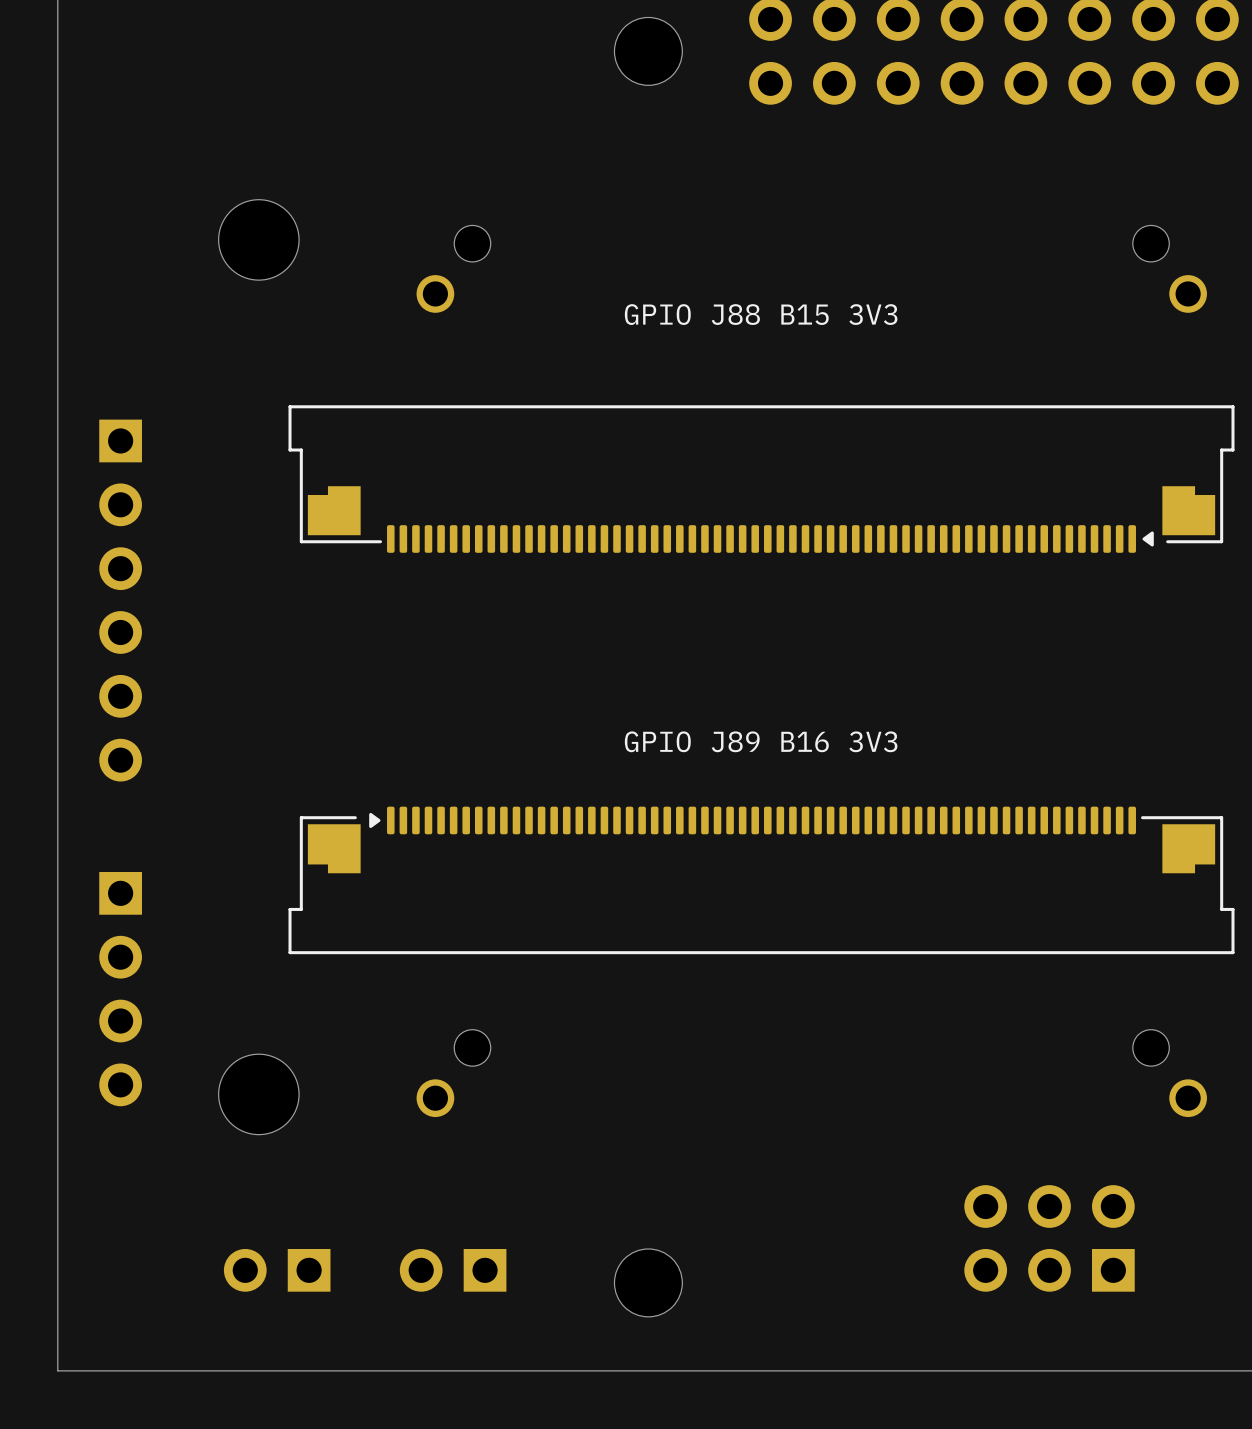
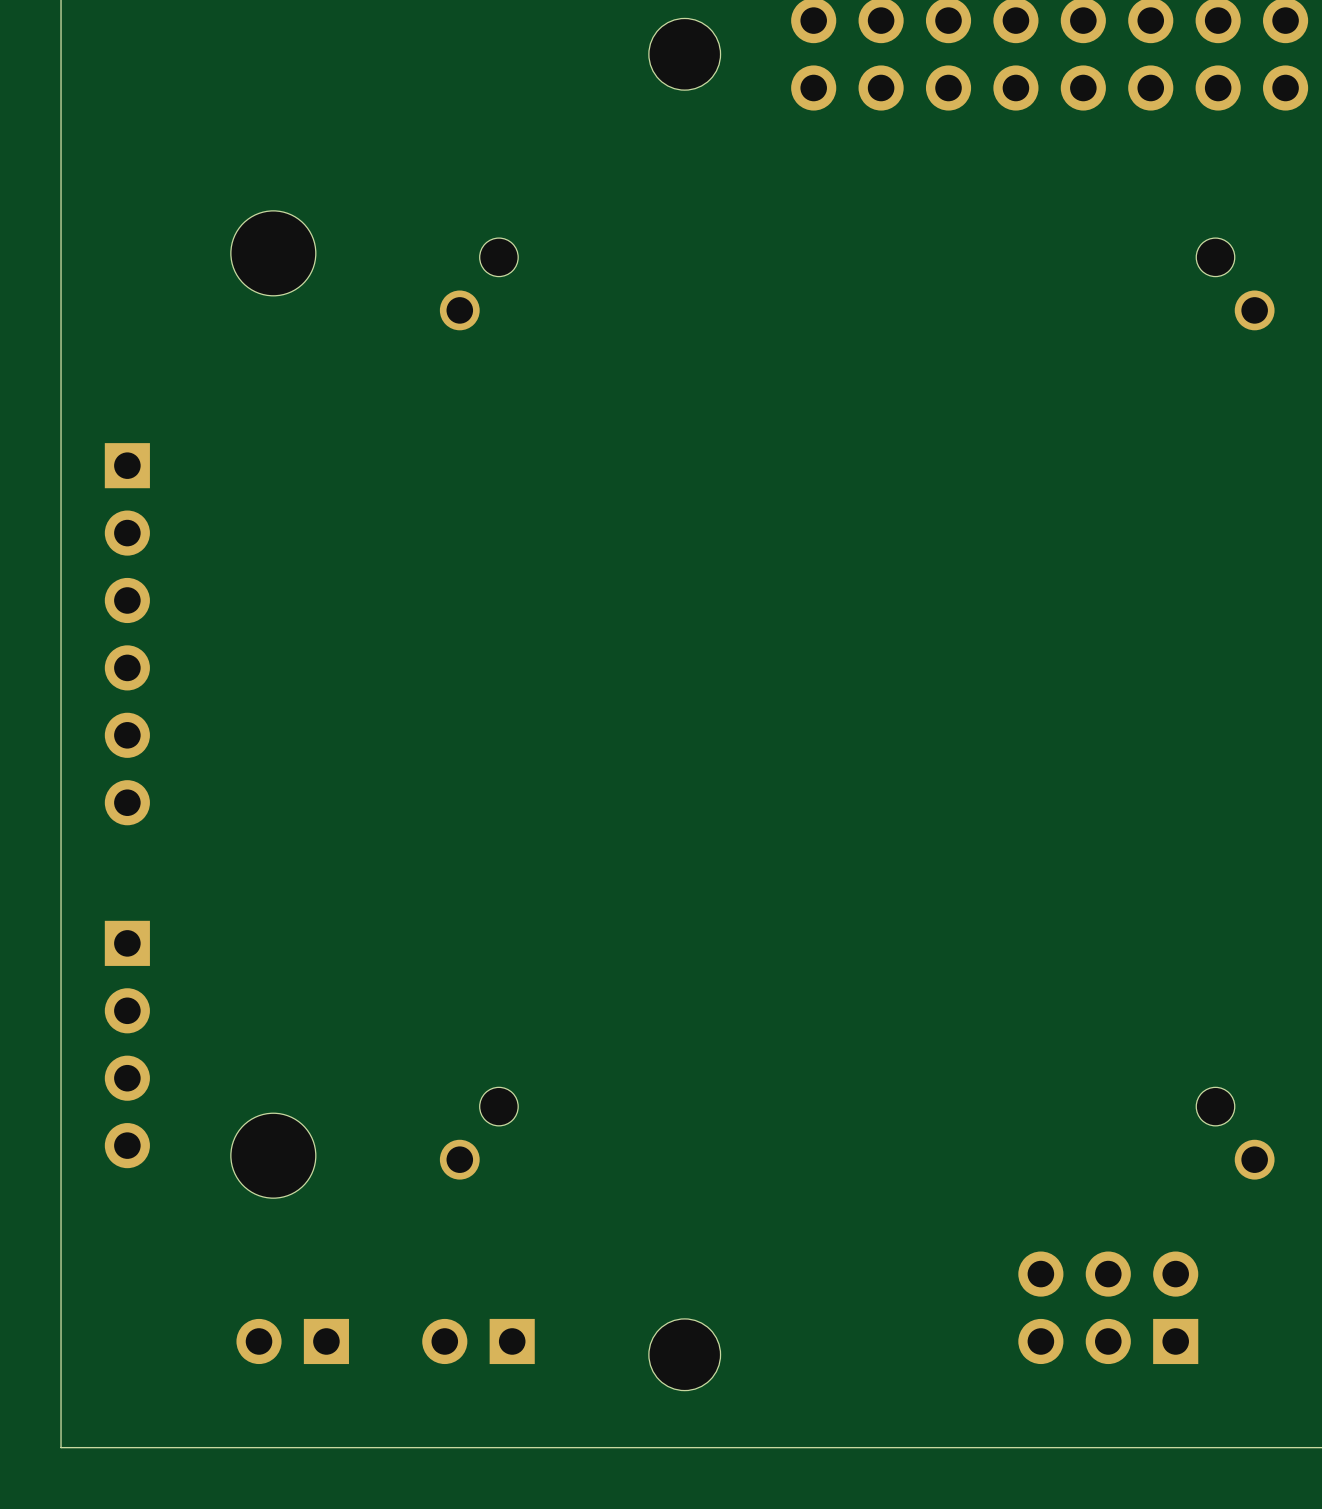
text: GPIO J88 B15 3V3 (761, 314) -> none
part: (761, 479) -> none
text: GPIO J89 B16 3V3 (761, 741) -> none
part: (761, 880) -> none

